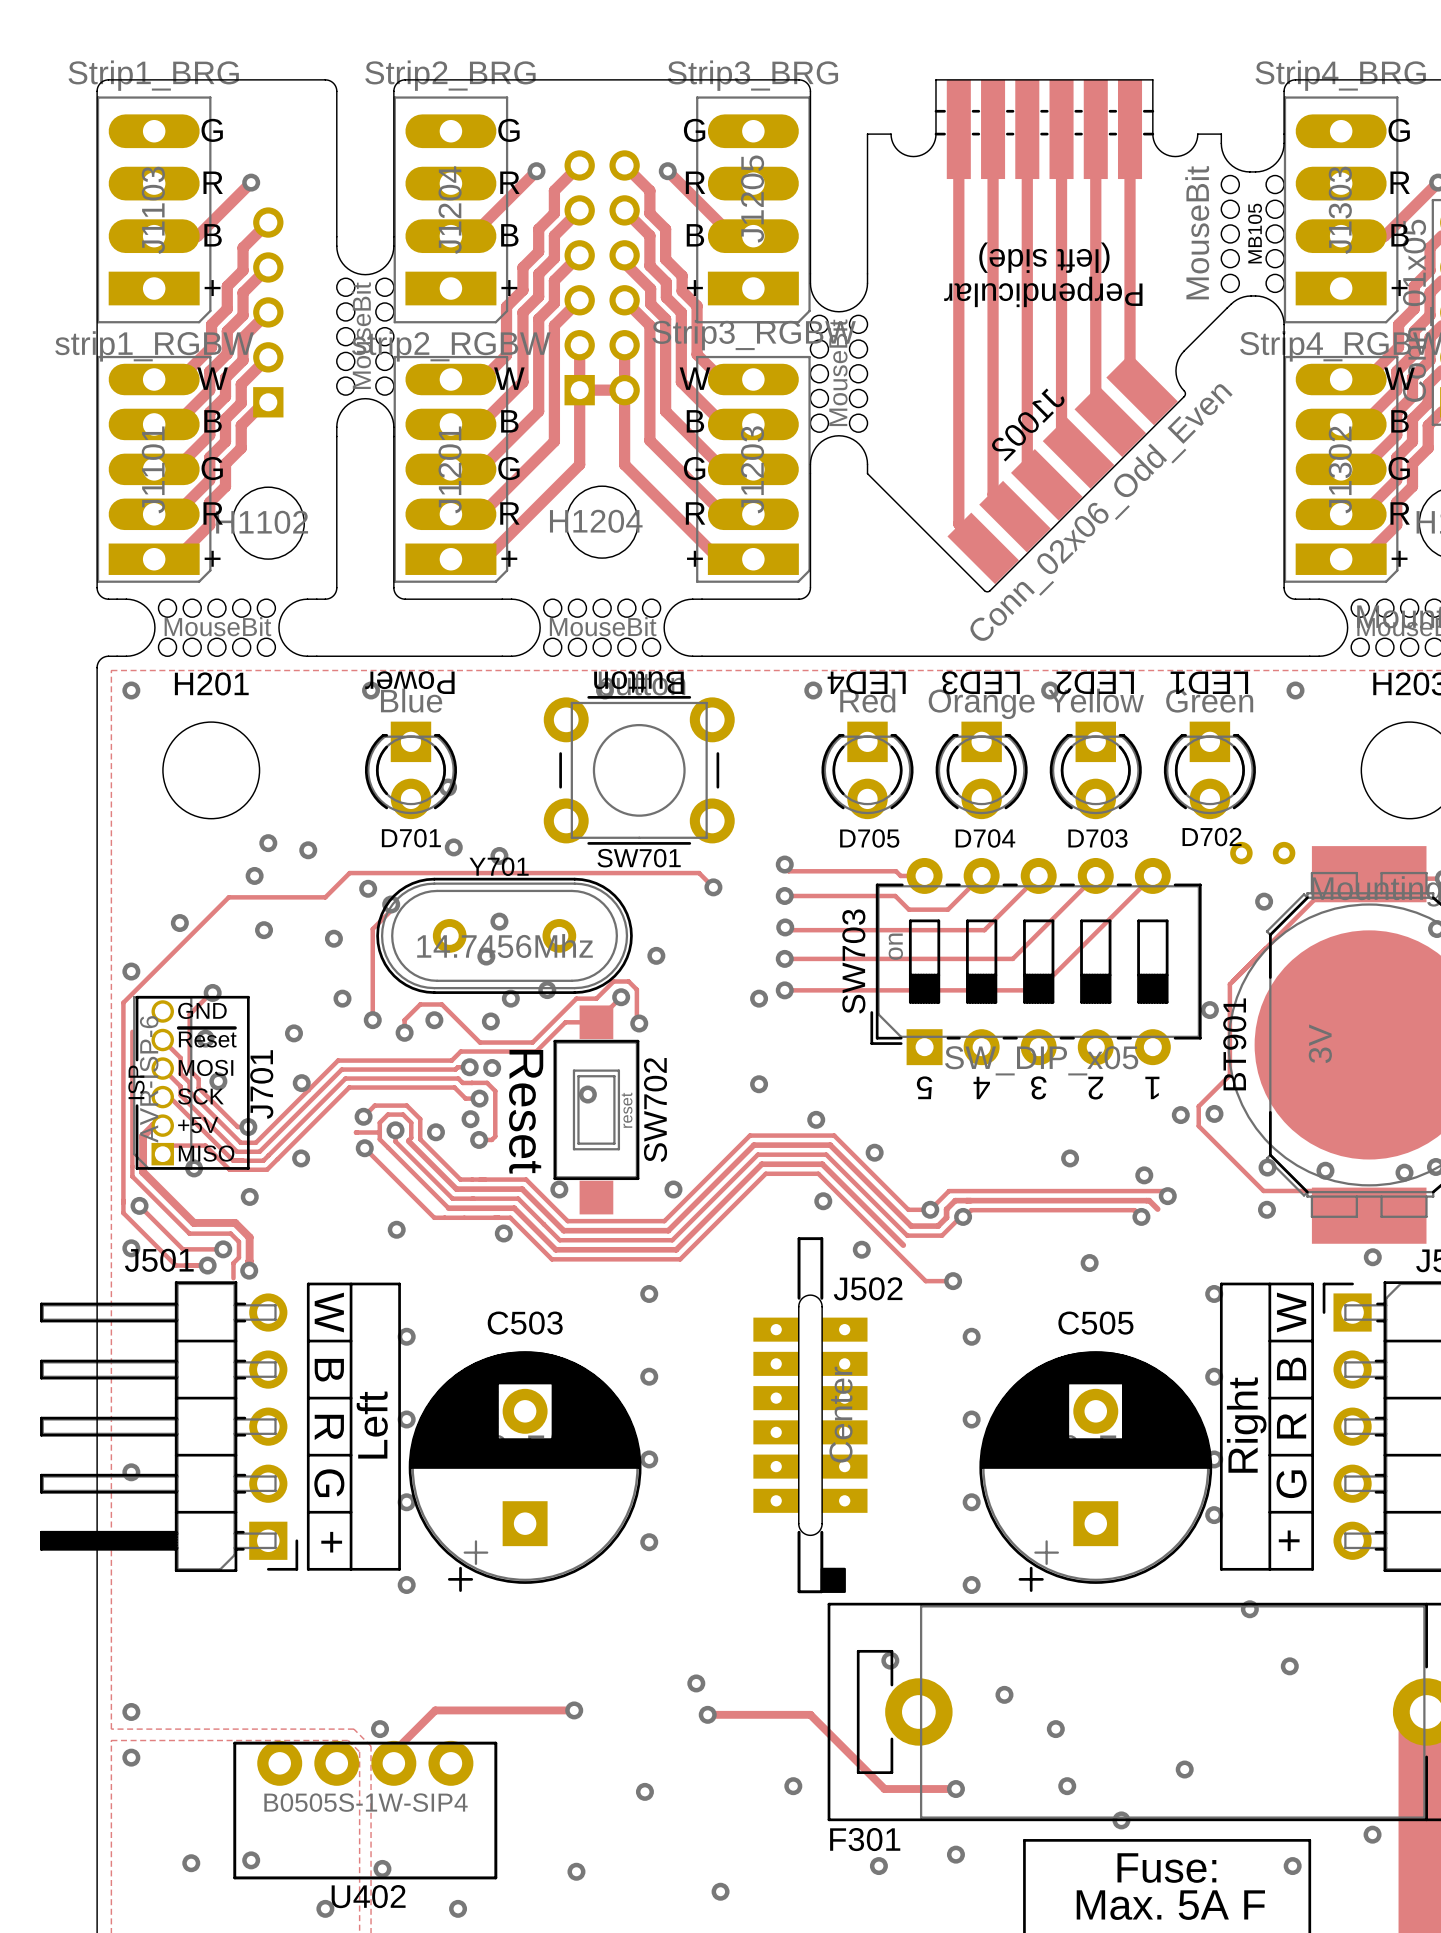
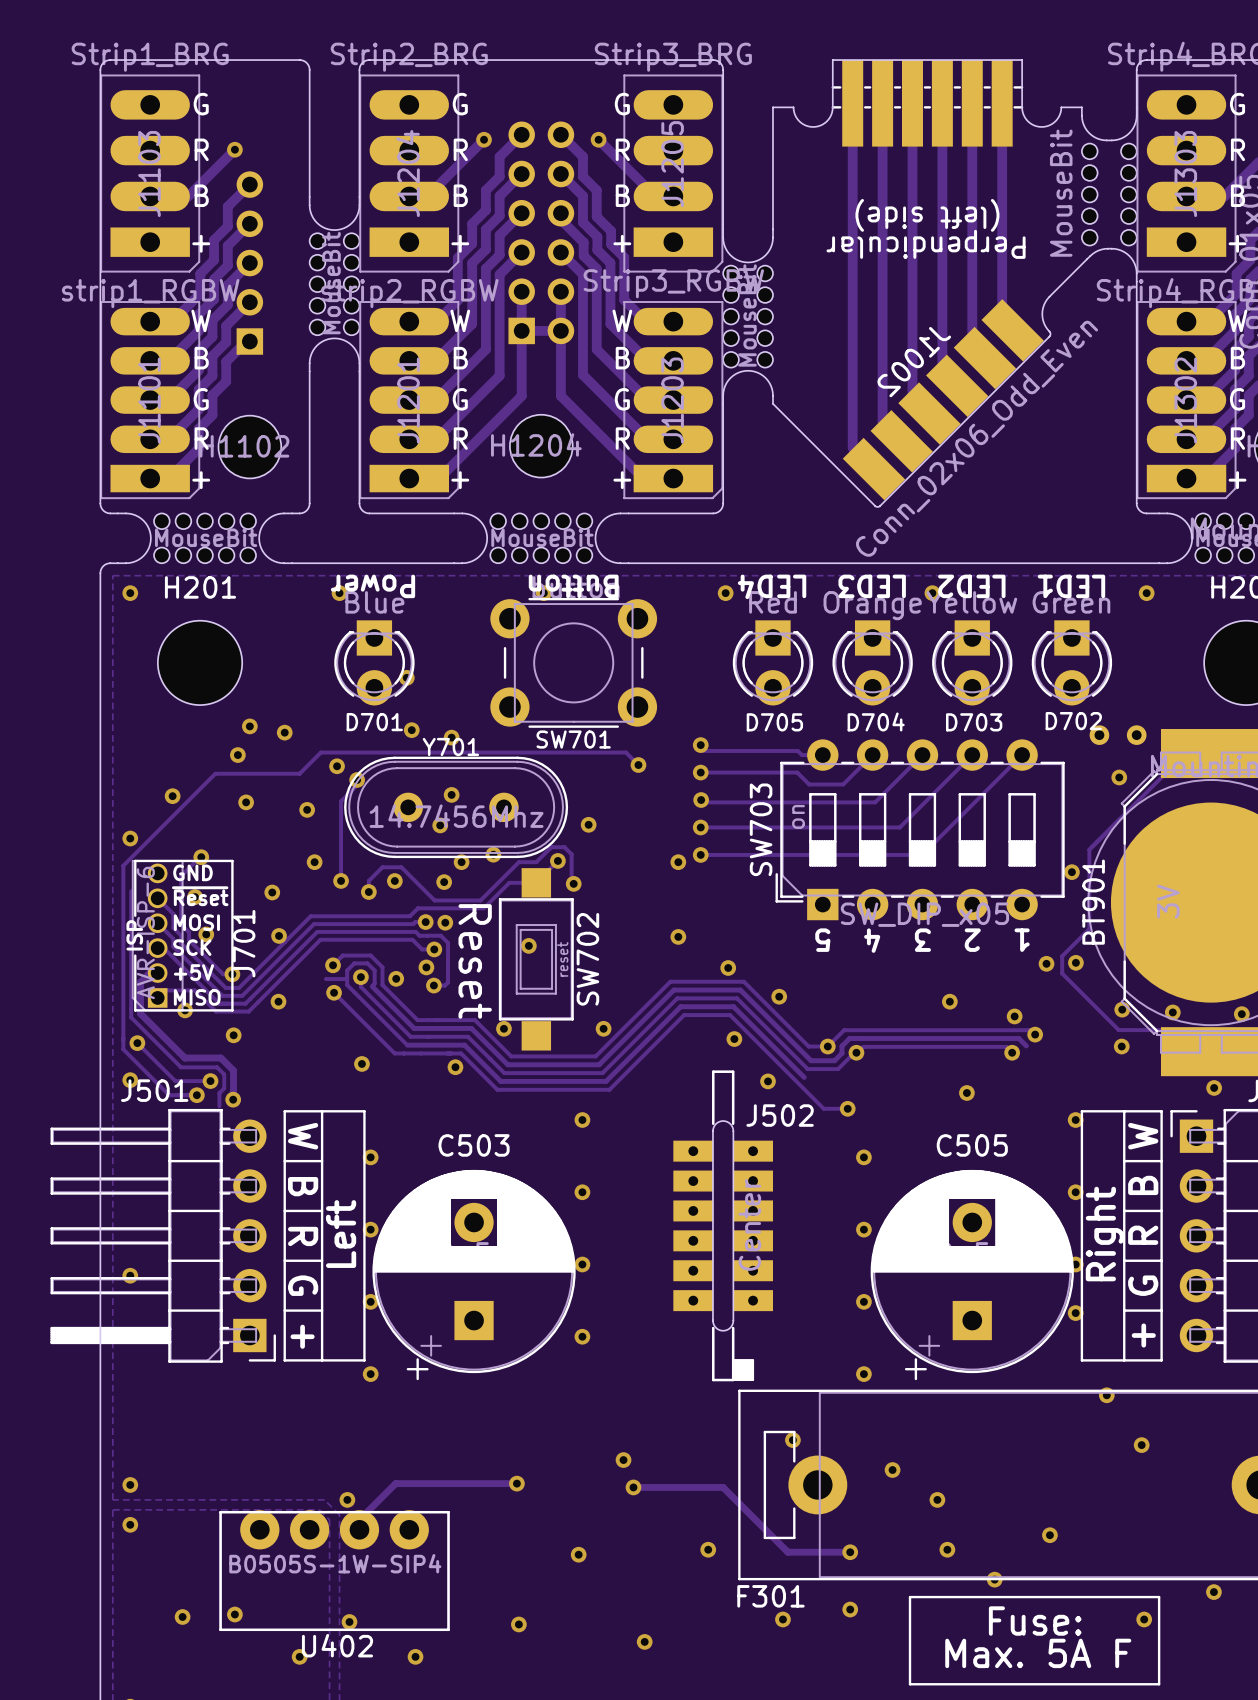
MB105 name: MB105 (1255, 233) -> none

